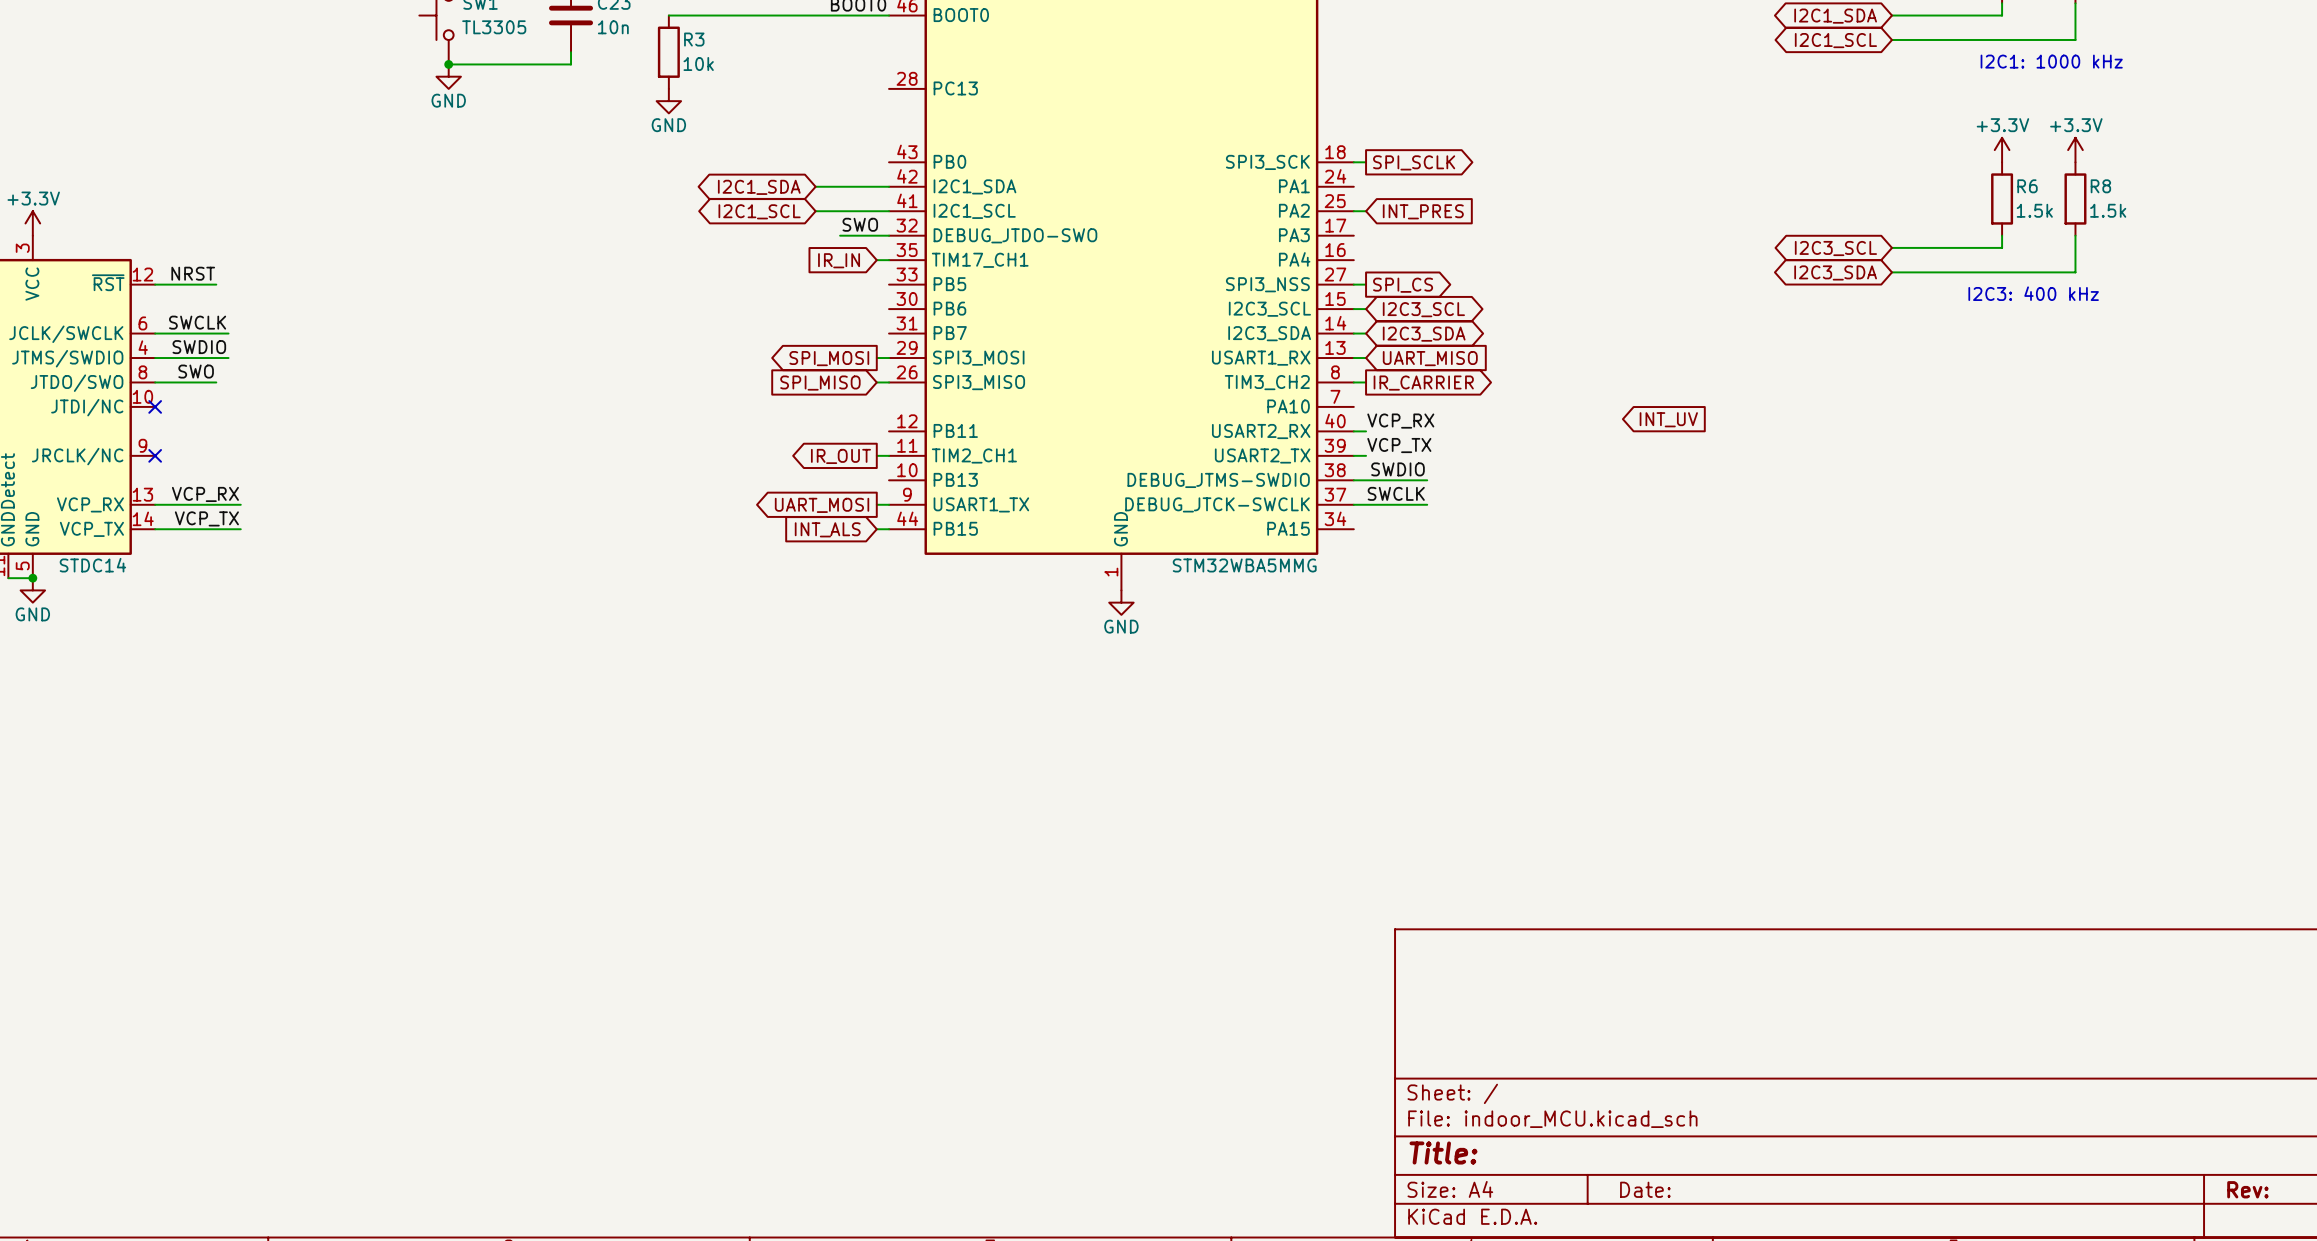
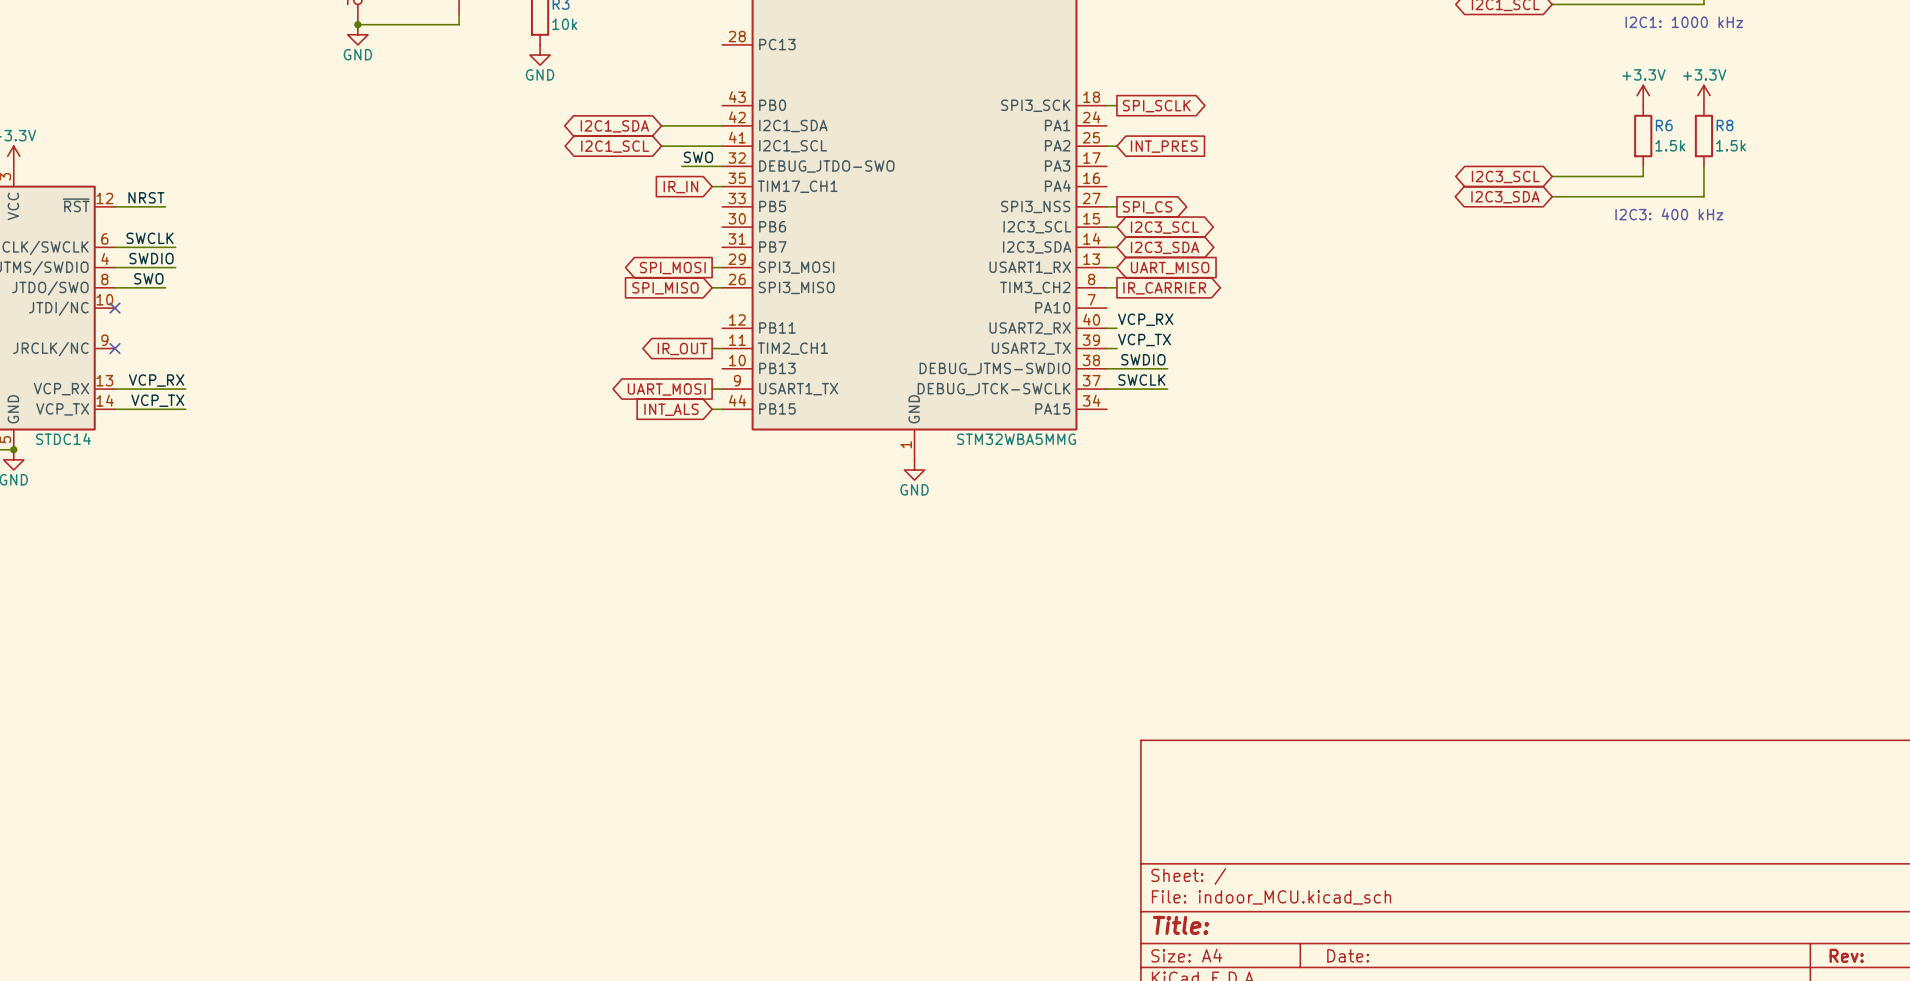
global label: INT_UV (1668, 419) -> none

